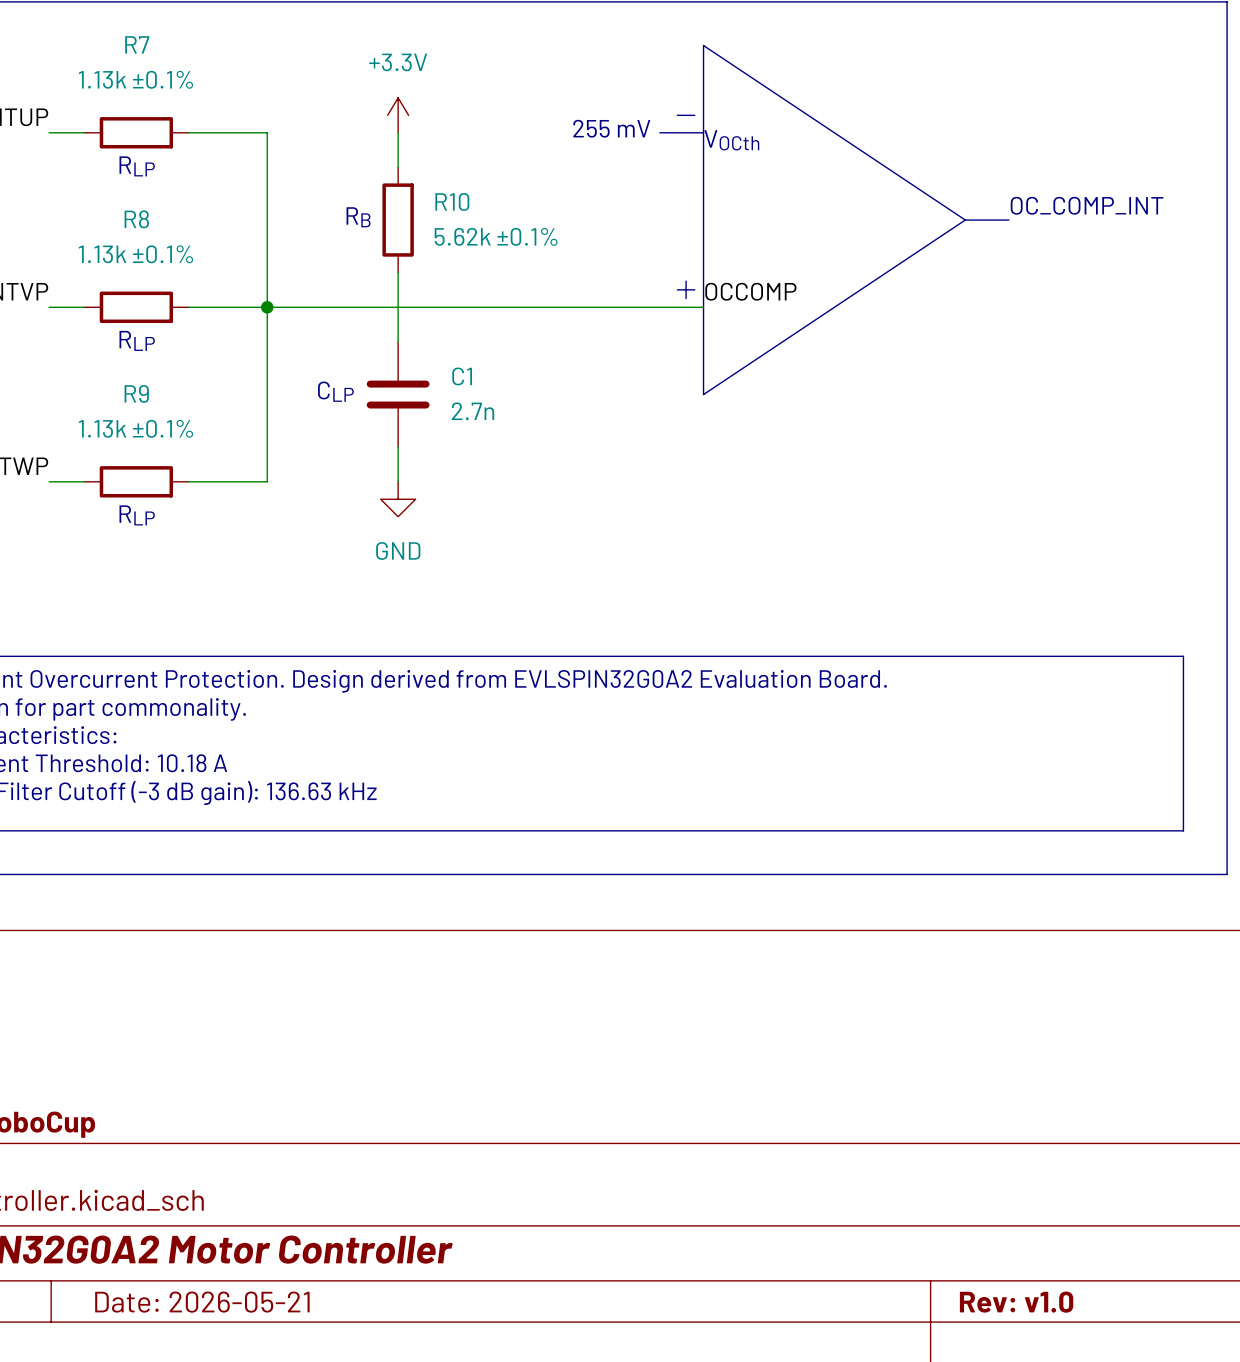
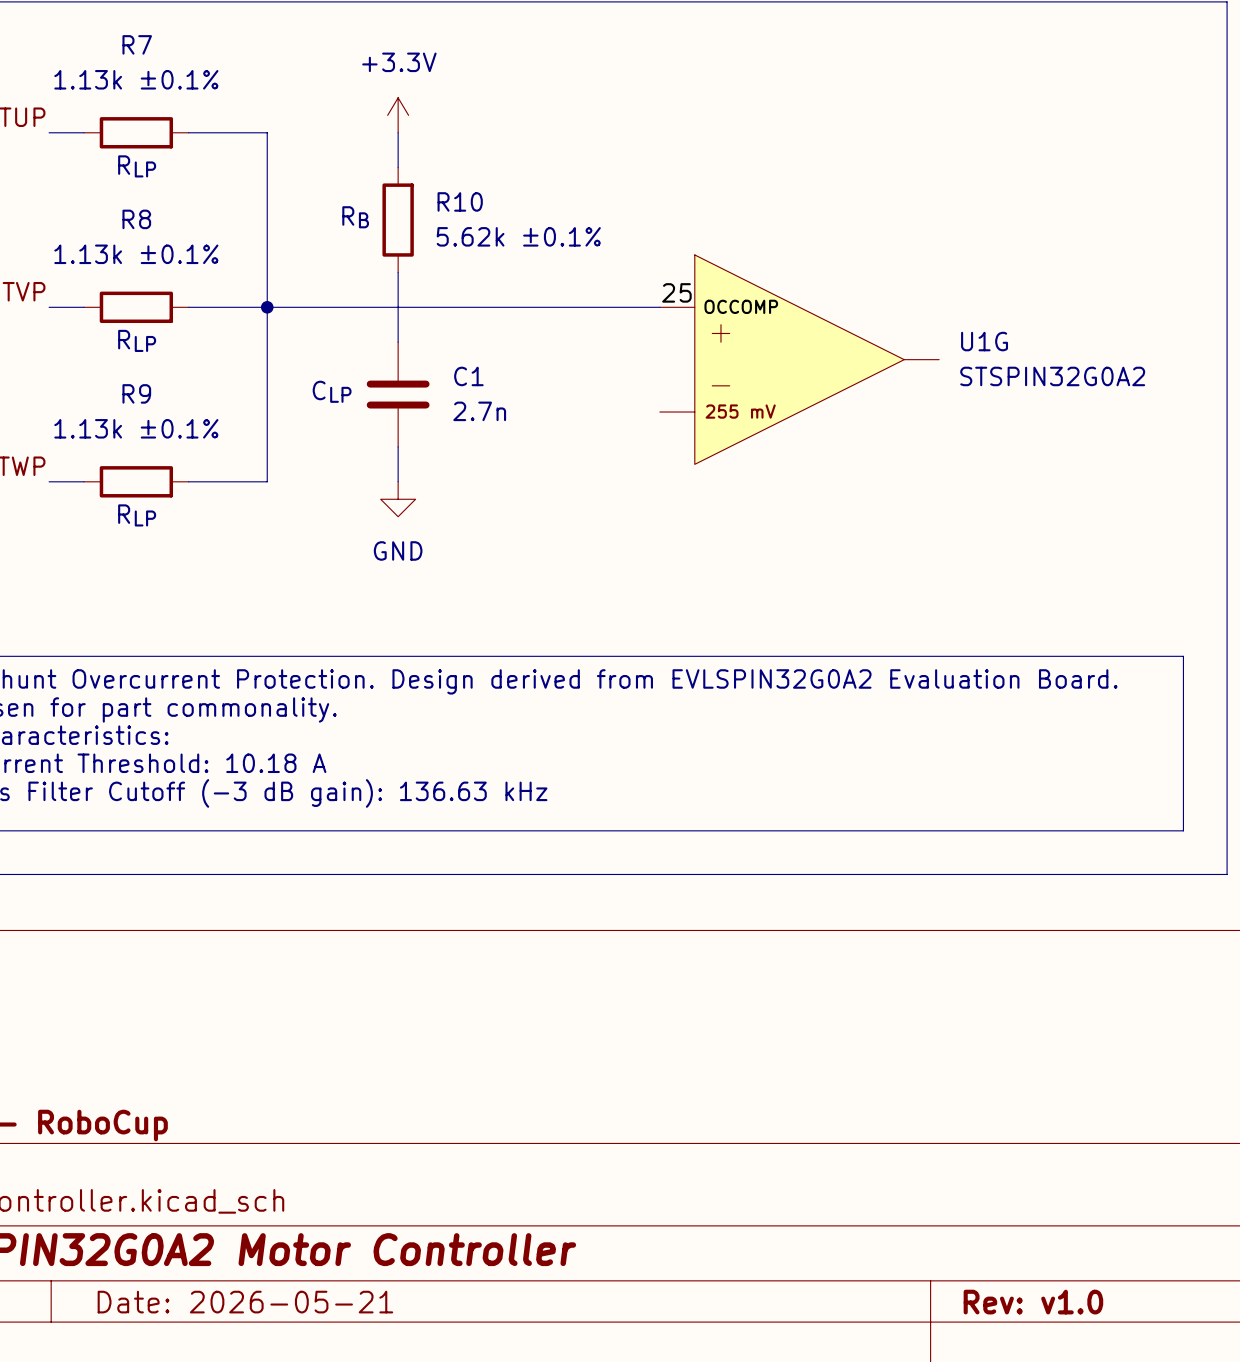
line: (677, 115) (694, 115) -> none
text: 255 mV (611, 128) -> none
line: (659, 132) (703, 132) -> none
text: VOCth (731, 140) -> none
text: OC_COMP_INT (1087, 205) -> none
line: (965, 220) (1008, 220) -> none
line: (965, 220) (703, 45) (703, 394) (965, 220) -> none
line: (686, 281) (686, 298) -> none
line: (677, 289) (694, 289) -> none
label: OCCOMP (750, 291) -> none
U1G: none -> STSPIN32G0A2 (799, 359)

